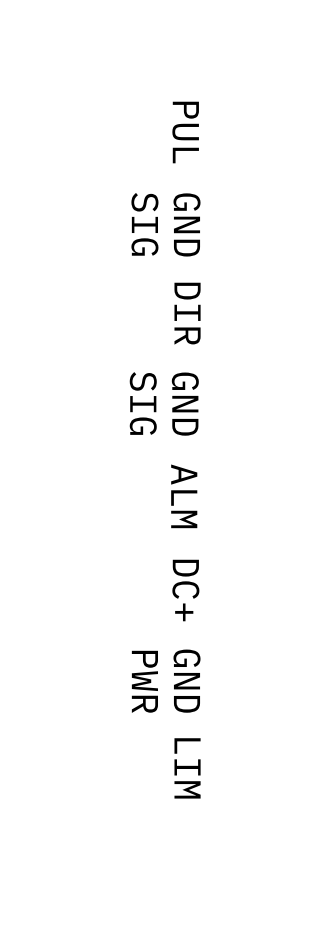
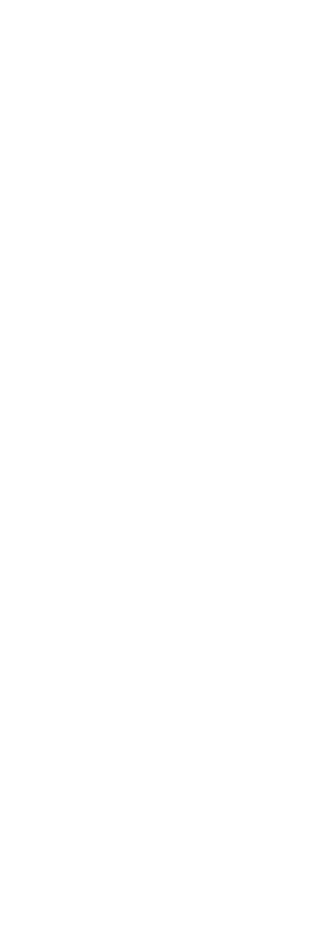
text: PUL (185, 132) -> none
text: SIG (144, 224) -> none
text: GND (187, 224) -> none
text: DIR (187, 313) -> none
text: SIG (143, 403) -> none
text: GND (185, 404) -> none
text: ALM (184, 496) -> none
text: DC+ (185, 590) -> none
text: PWR (144, 681) -> none
text: GND (187, 681) -> none
text: LIM (187, 768) -> none

